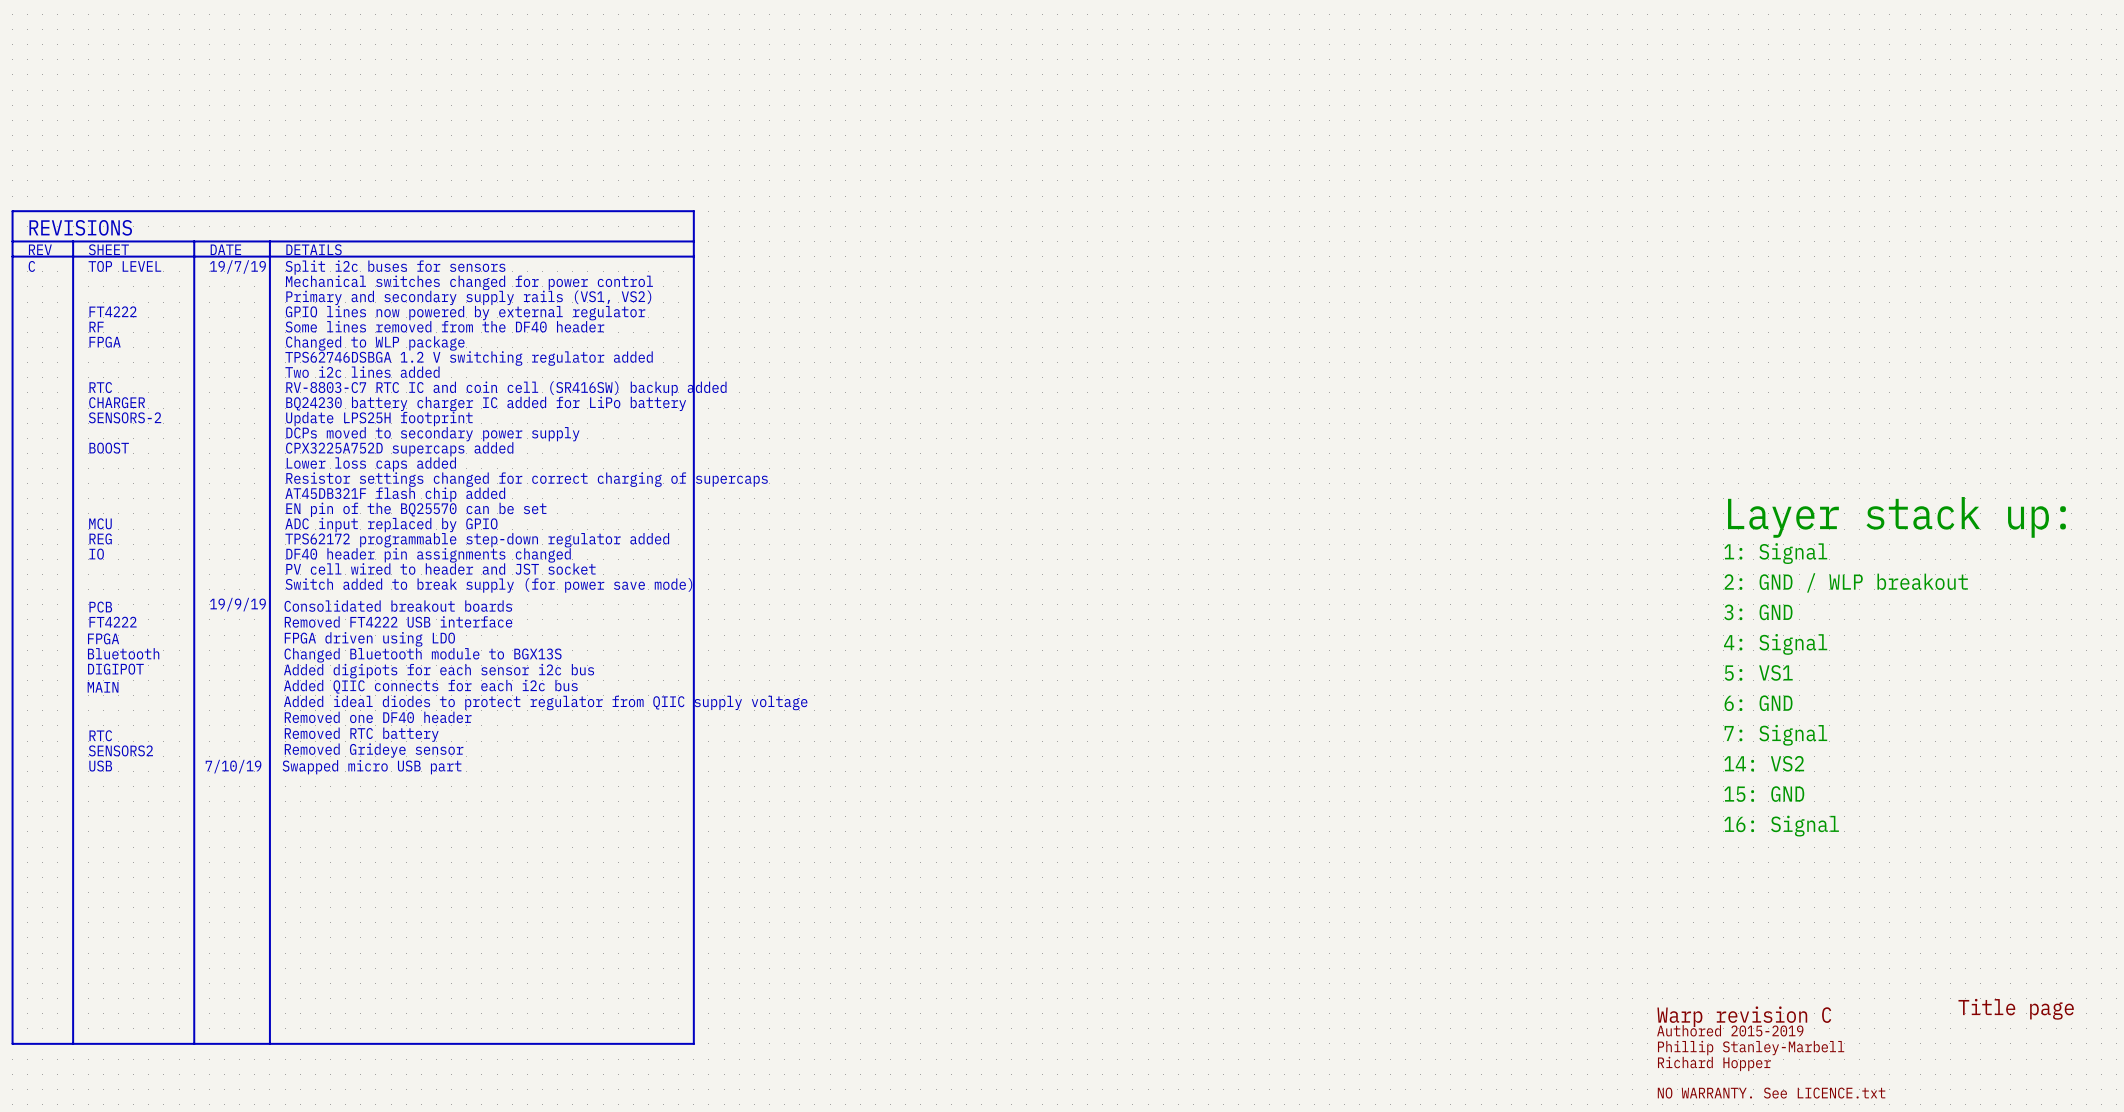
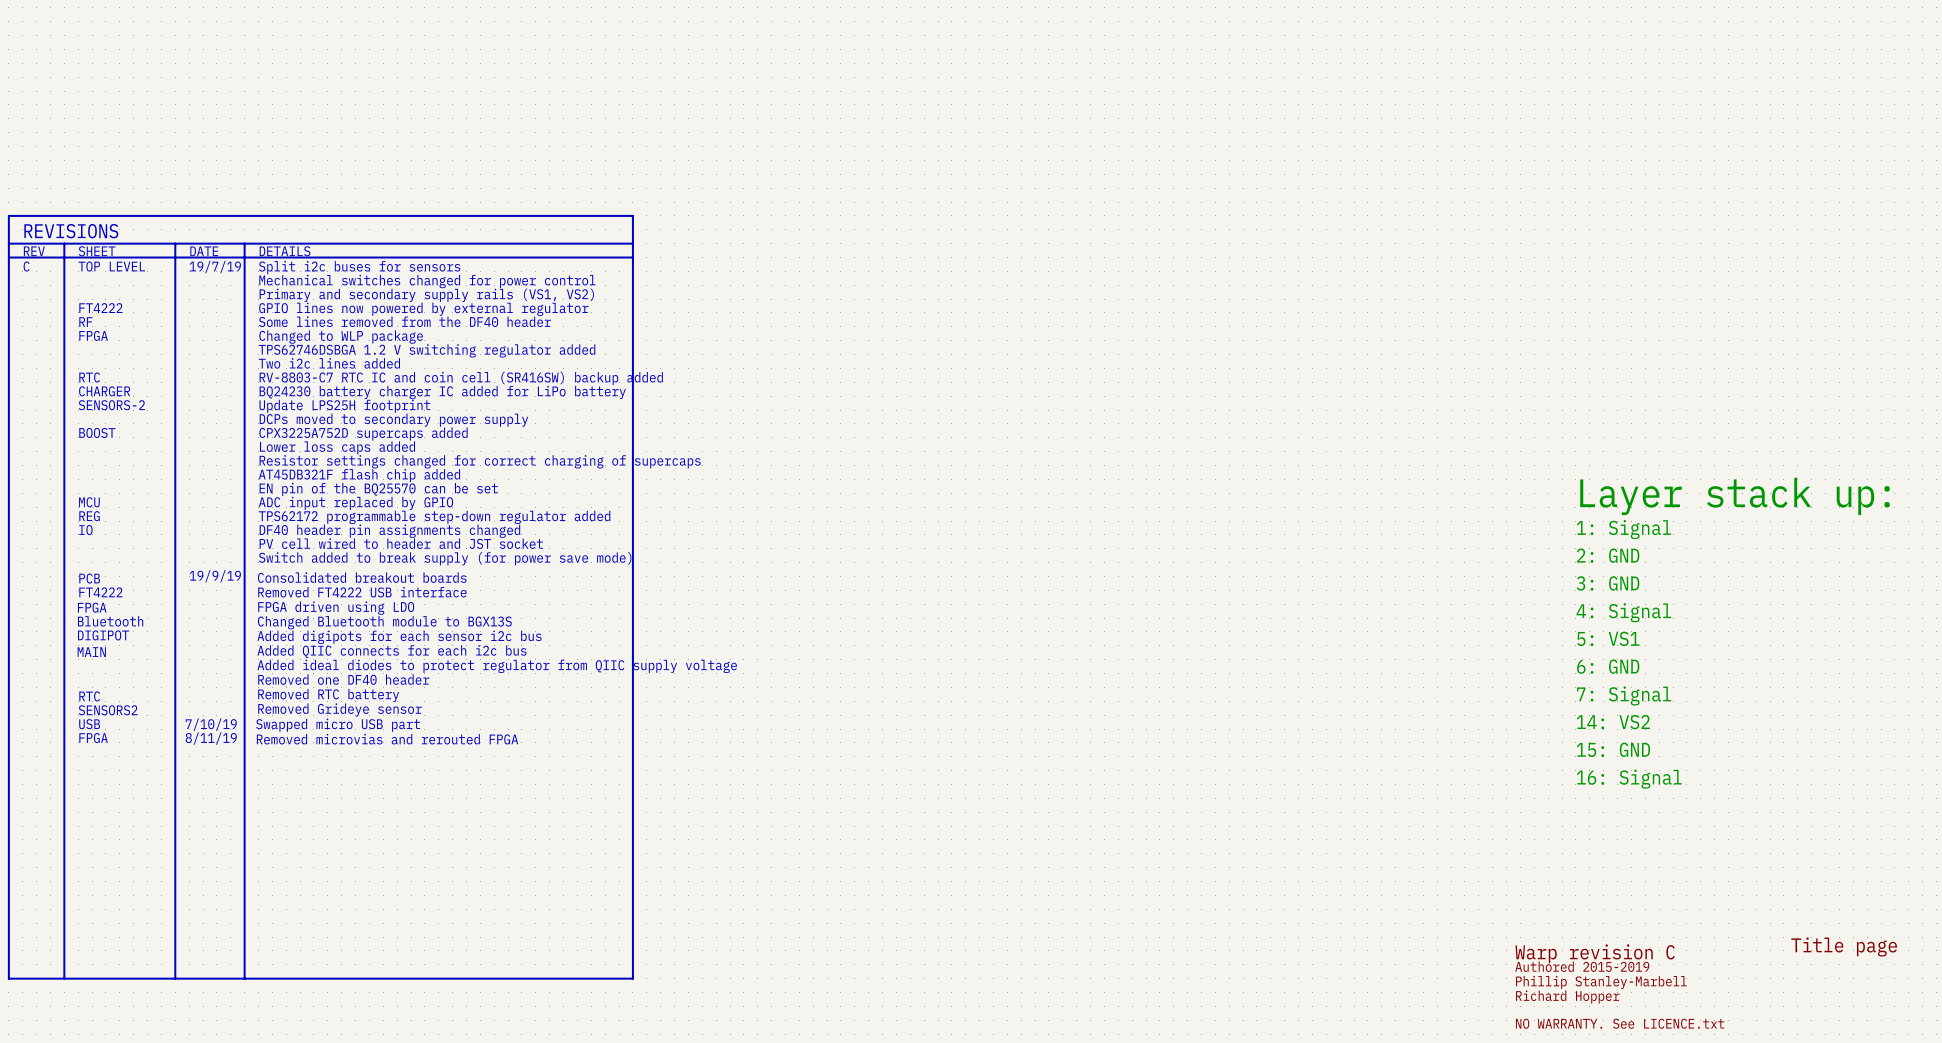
text: 2: GND / WLP breakout (1846, 582) -> 2: GND (1608, 555)
text: none -> FPGA (93, 738)
text: none -> 8/11/19 (211, 738)
text: none -> Removed microvias and rerouted FPGA (387, 739)

